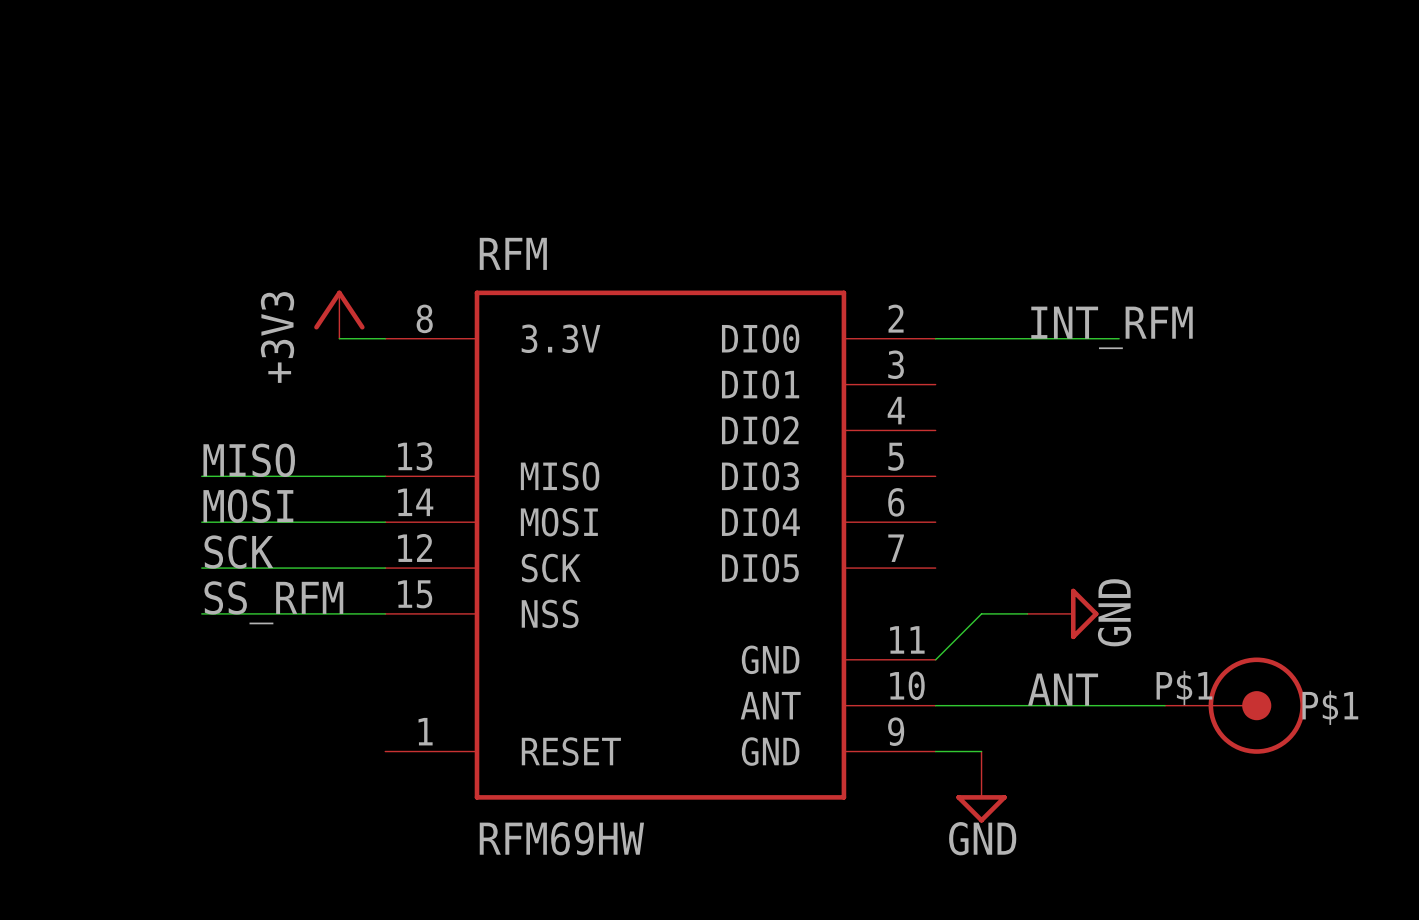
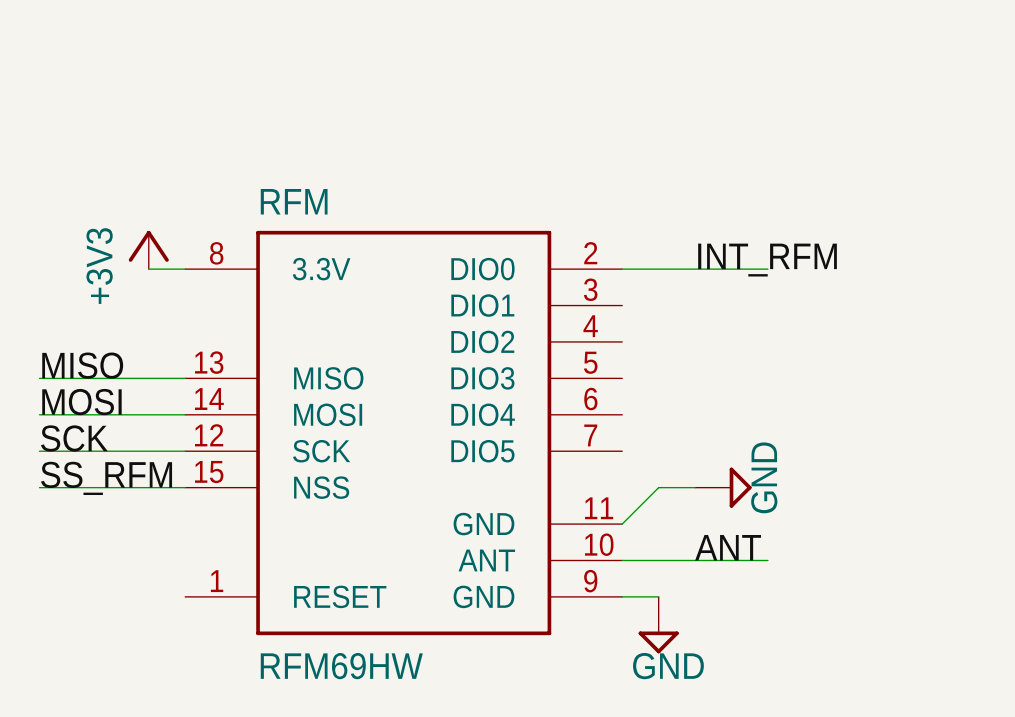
wire: (1119, 705) (1165, 705) -> none
part: (1234, 705) -> none

